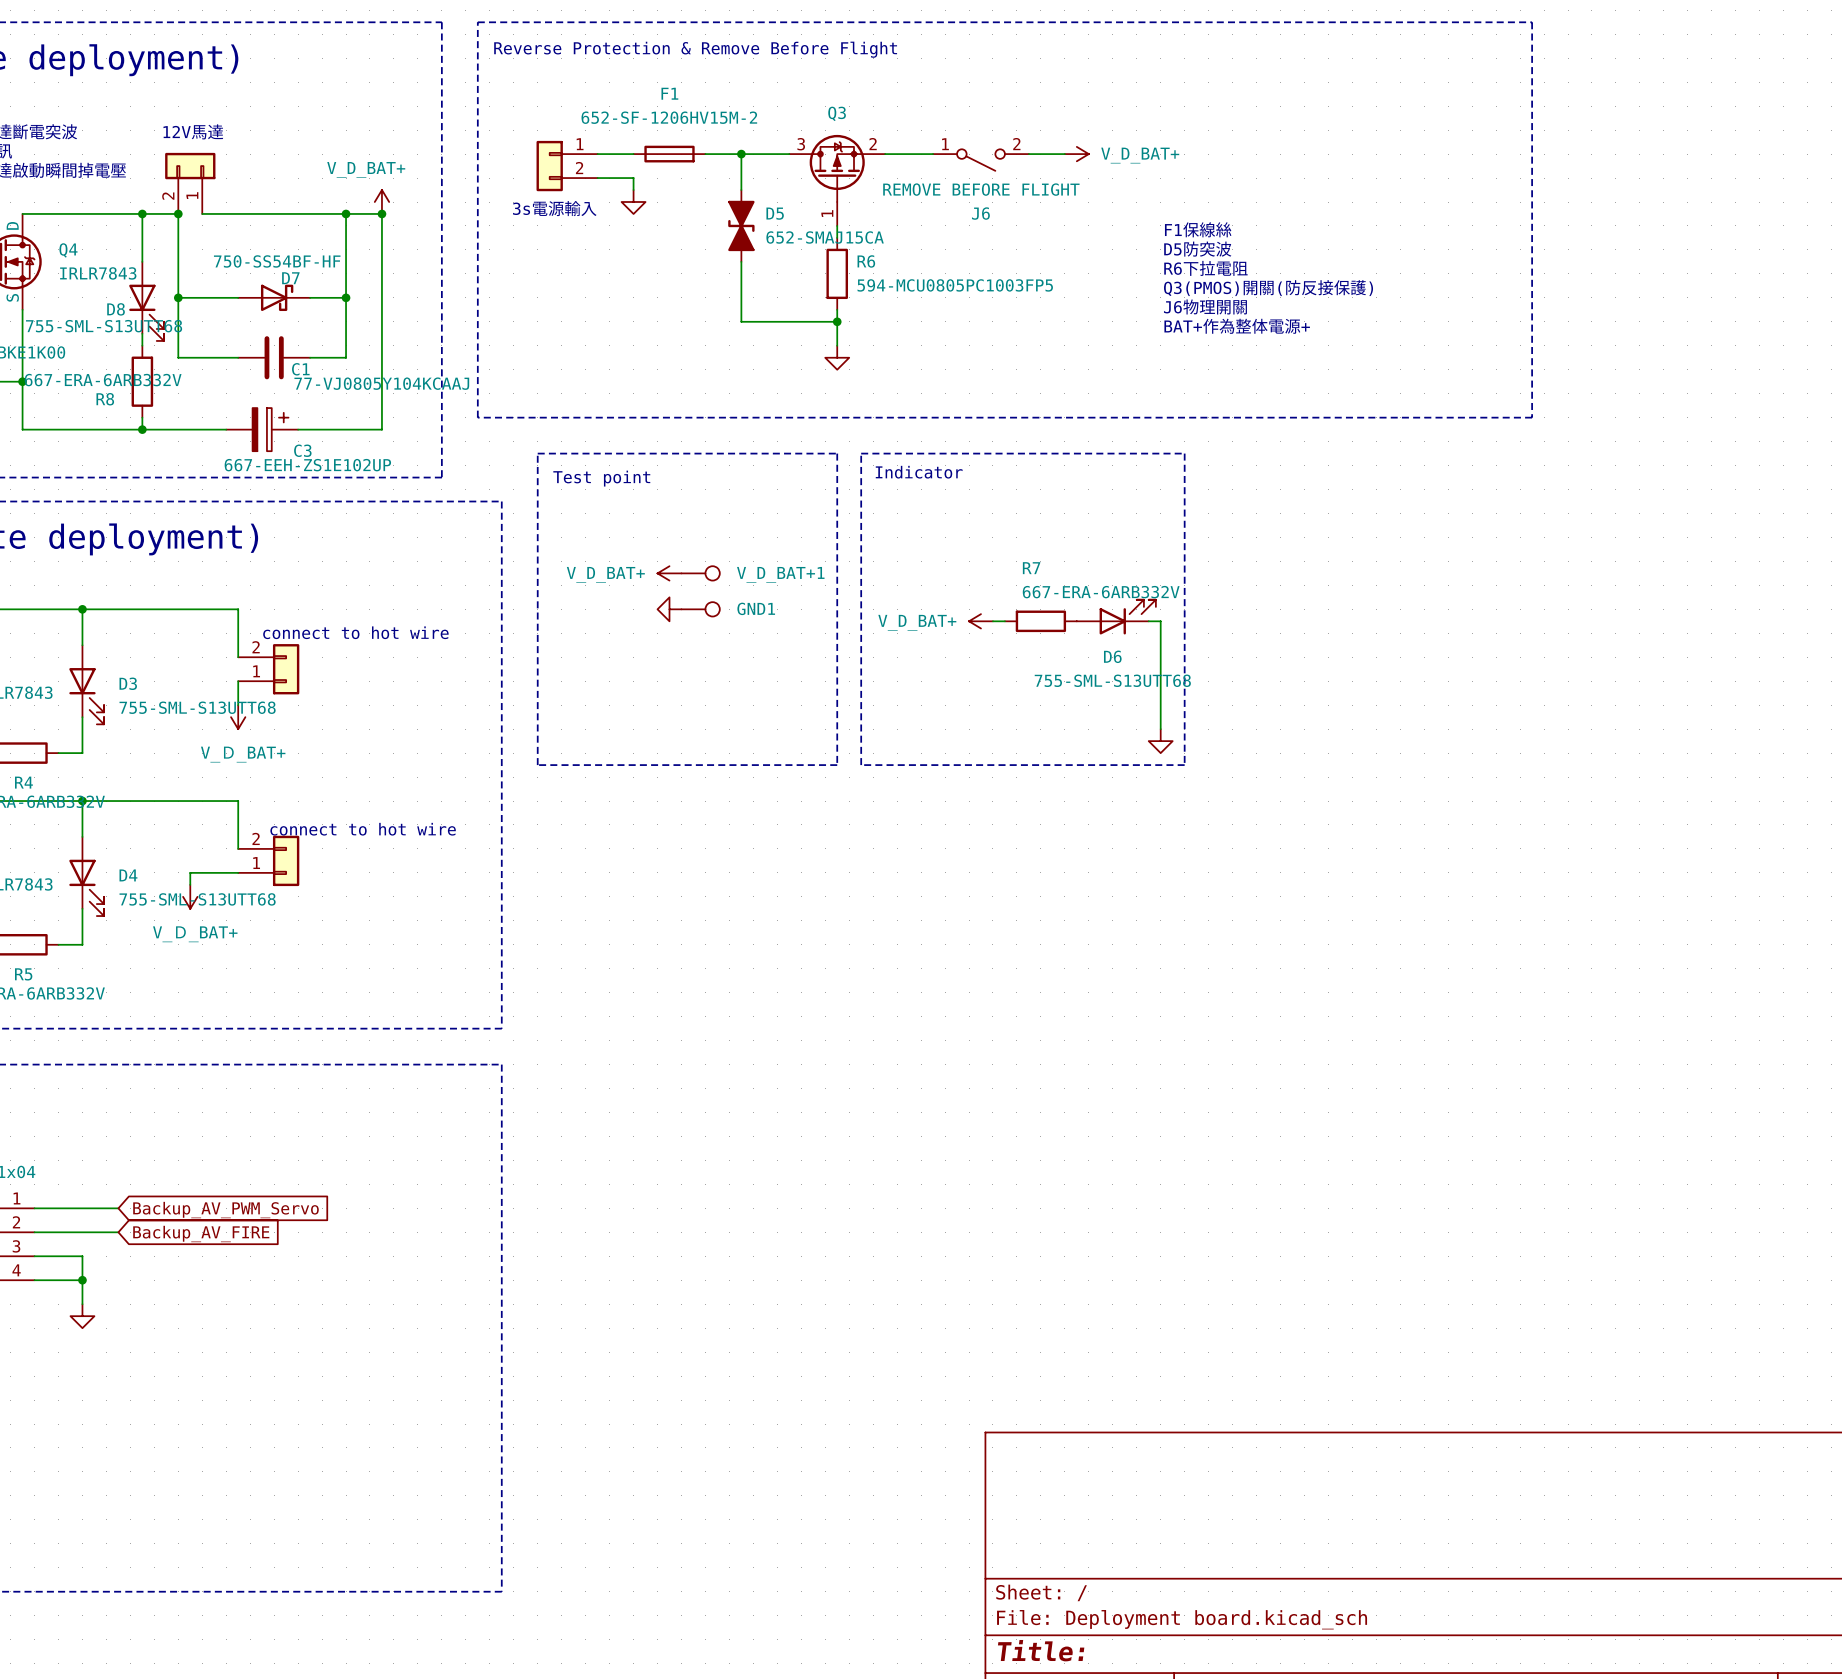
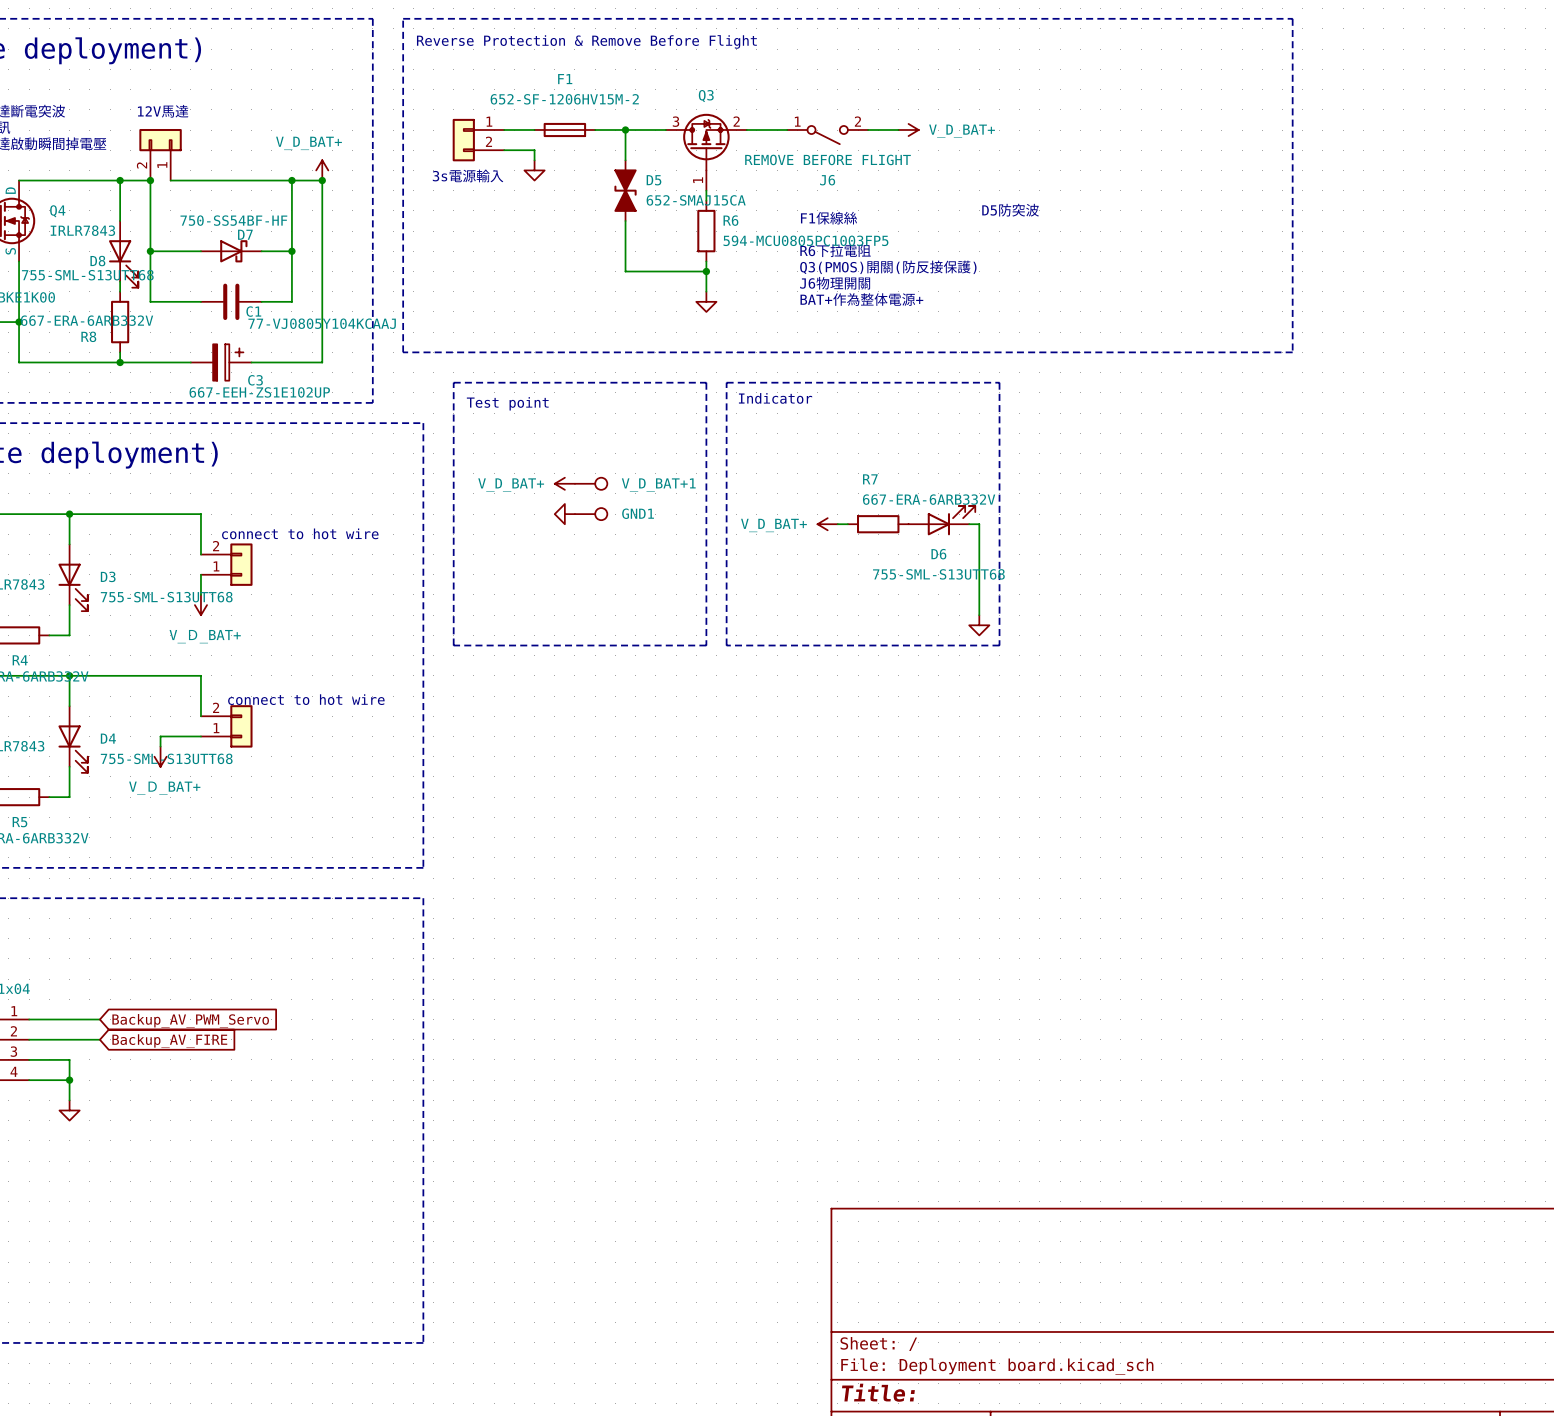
text position: F1保線絲 (1198, 229) -> F1保線絲 (828, 218)
text position: R6下拉電阻 (1205, 268) -> R6下拉電阻 (835, 250)
text position: Q3(PMOS)開關(防反接保護) (1268, 288) -> Q3(PMOS)開關(防反接保護) (888, 267)
text position: J6物理開關 (1205, 306) -> J6物理開關 (835, 283)
text position: BAT+作為整体電源+ (1237, 326) -> BAT+作為整体電源+ (861, 299)

